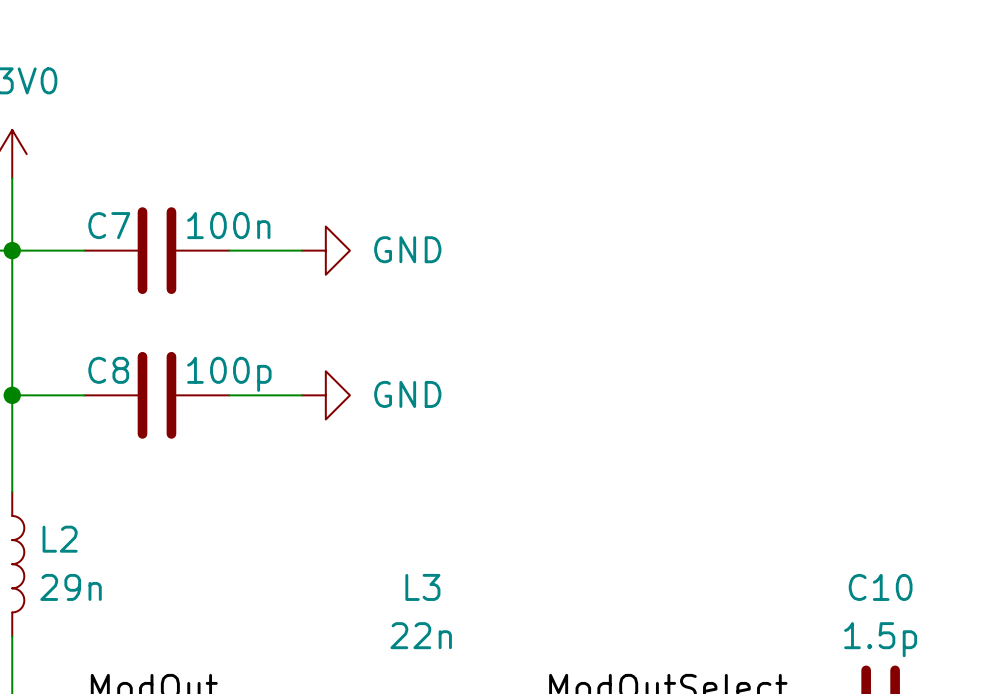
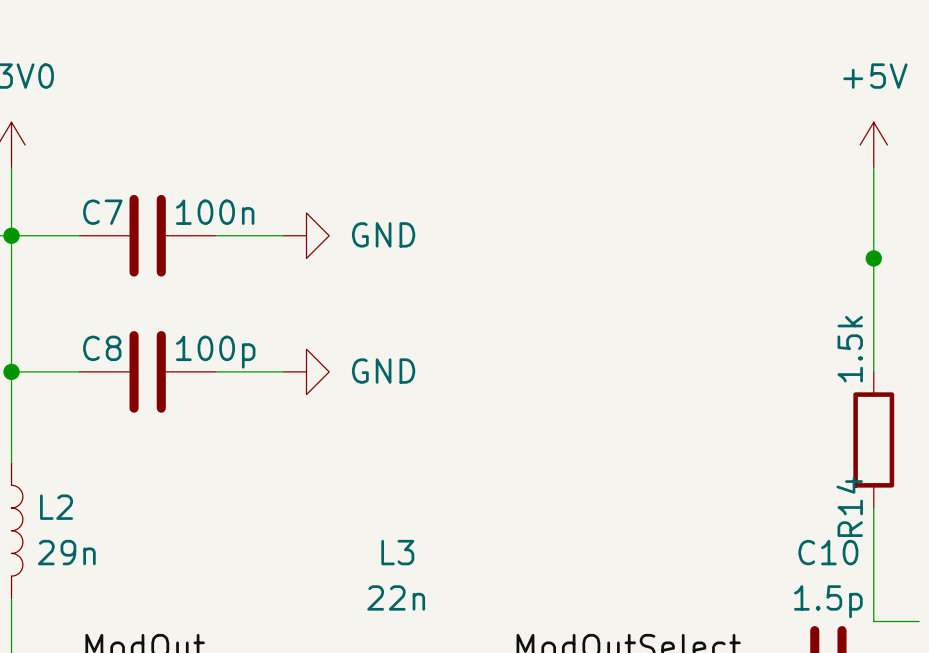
power symbol: none -> +5V (873, 144)
wire: none -> (873, 167) (873, 371)
junction: none -> (873, 258)
R14: none -> 1.5k (873, 439)
wire: none -> (873, 508) (873, 621) (919, 621)

